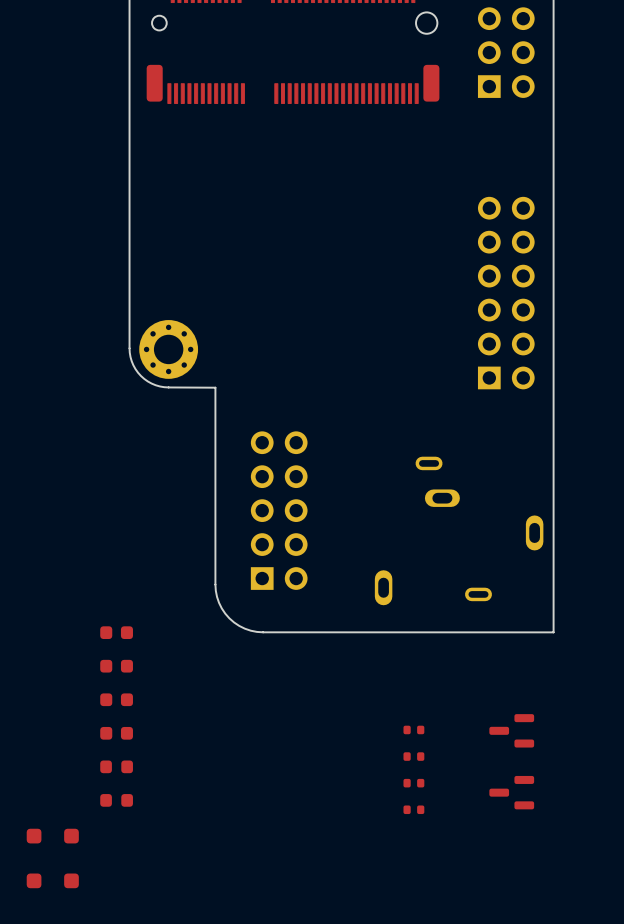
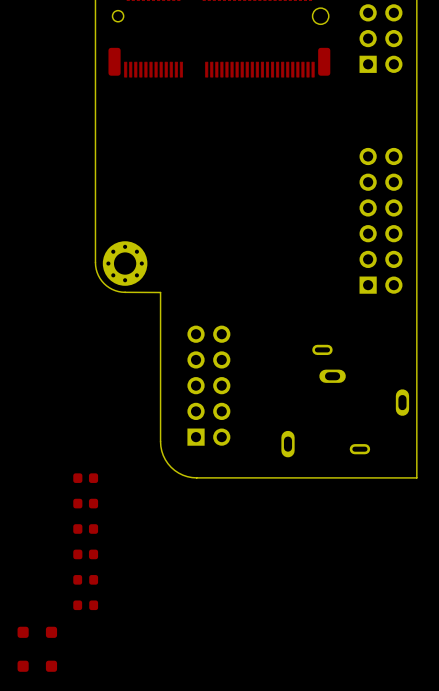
part: (413, 729) -> none
part: (511, 730) -> none
part: (413, 756) -> none
part: (413, 783) -> none
part: (511, 792) -> none
part: (413, 809) -> none

